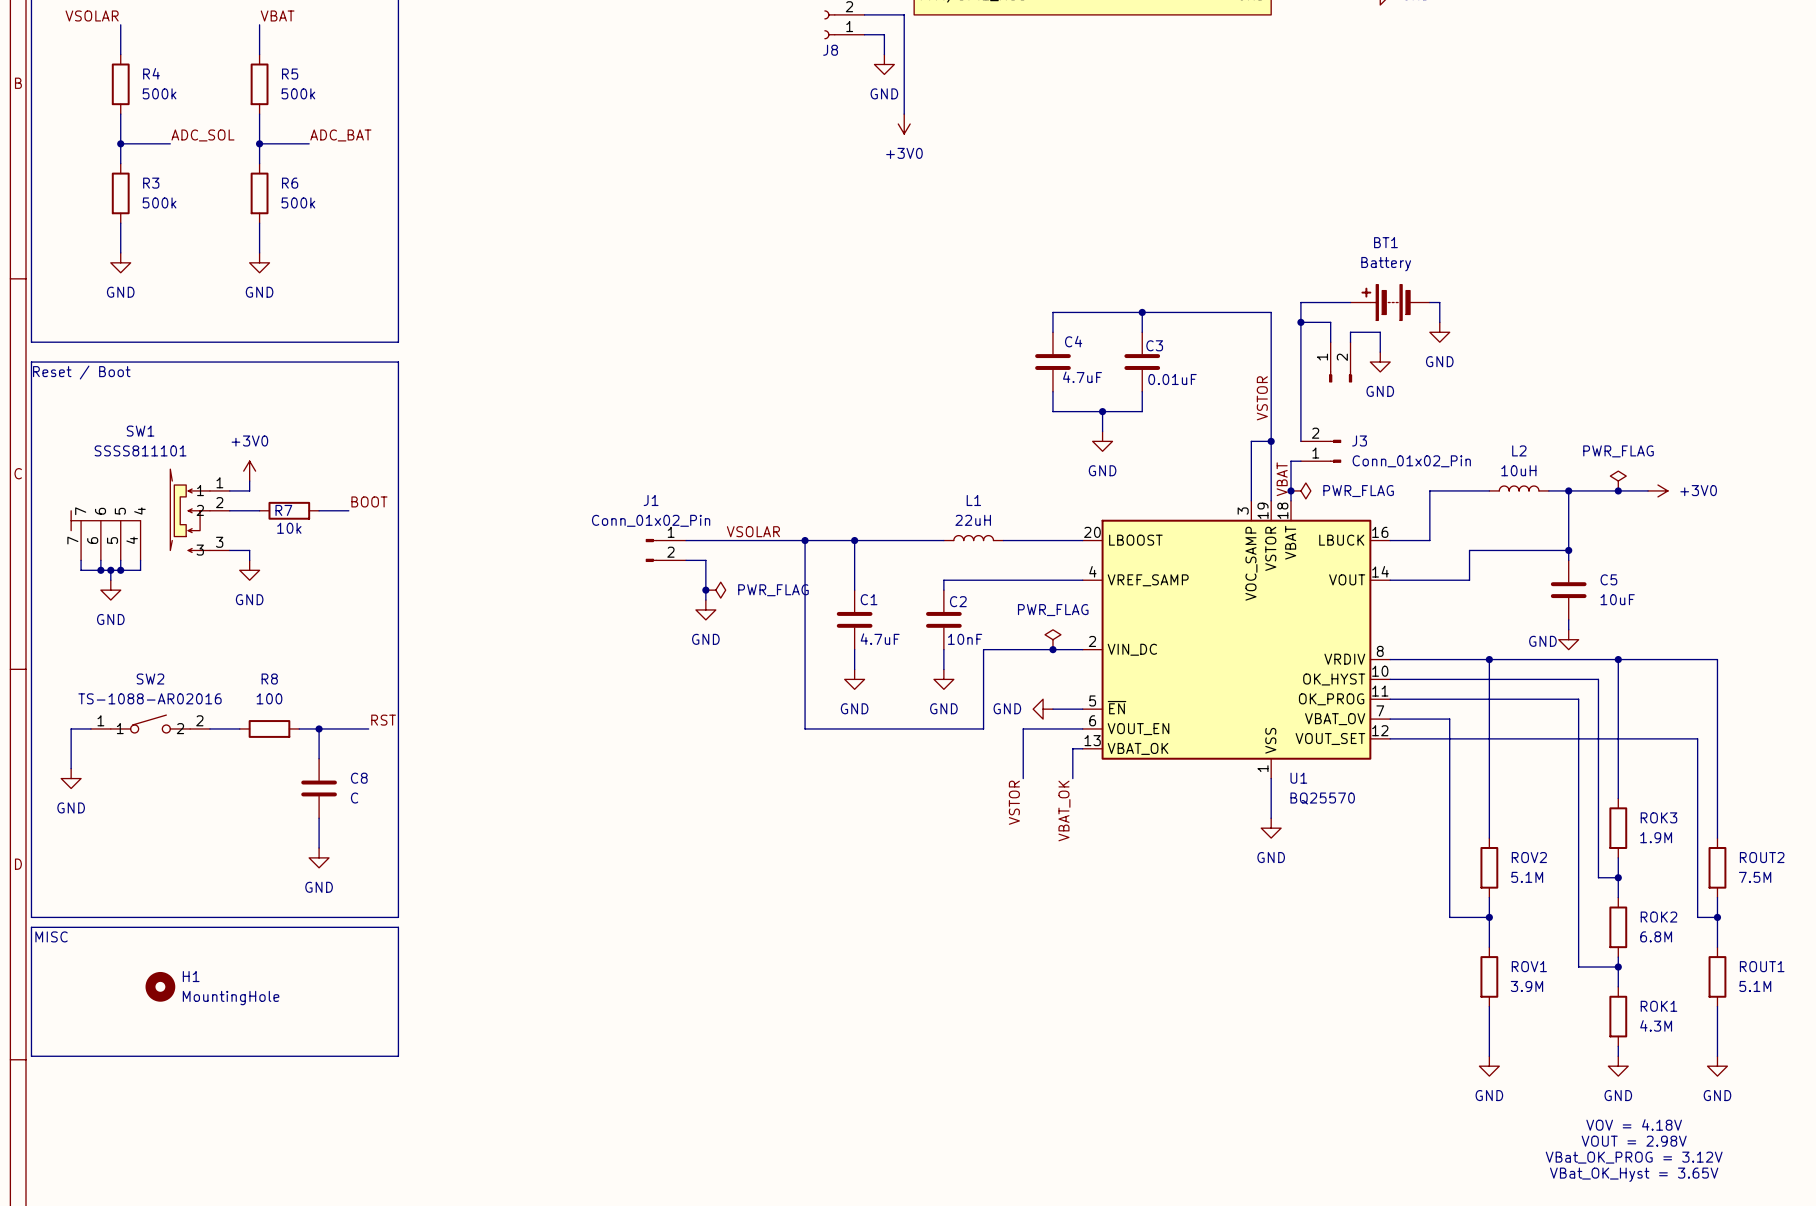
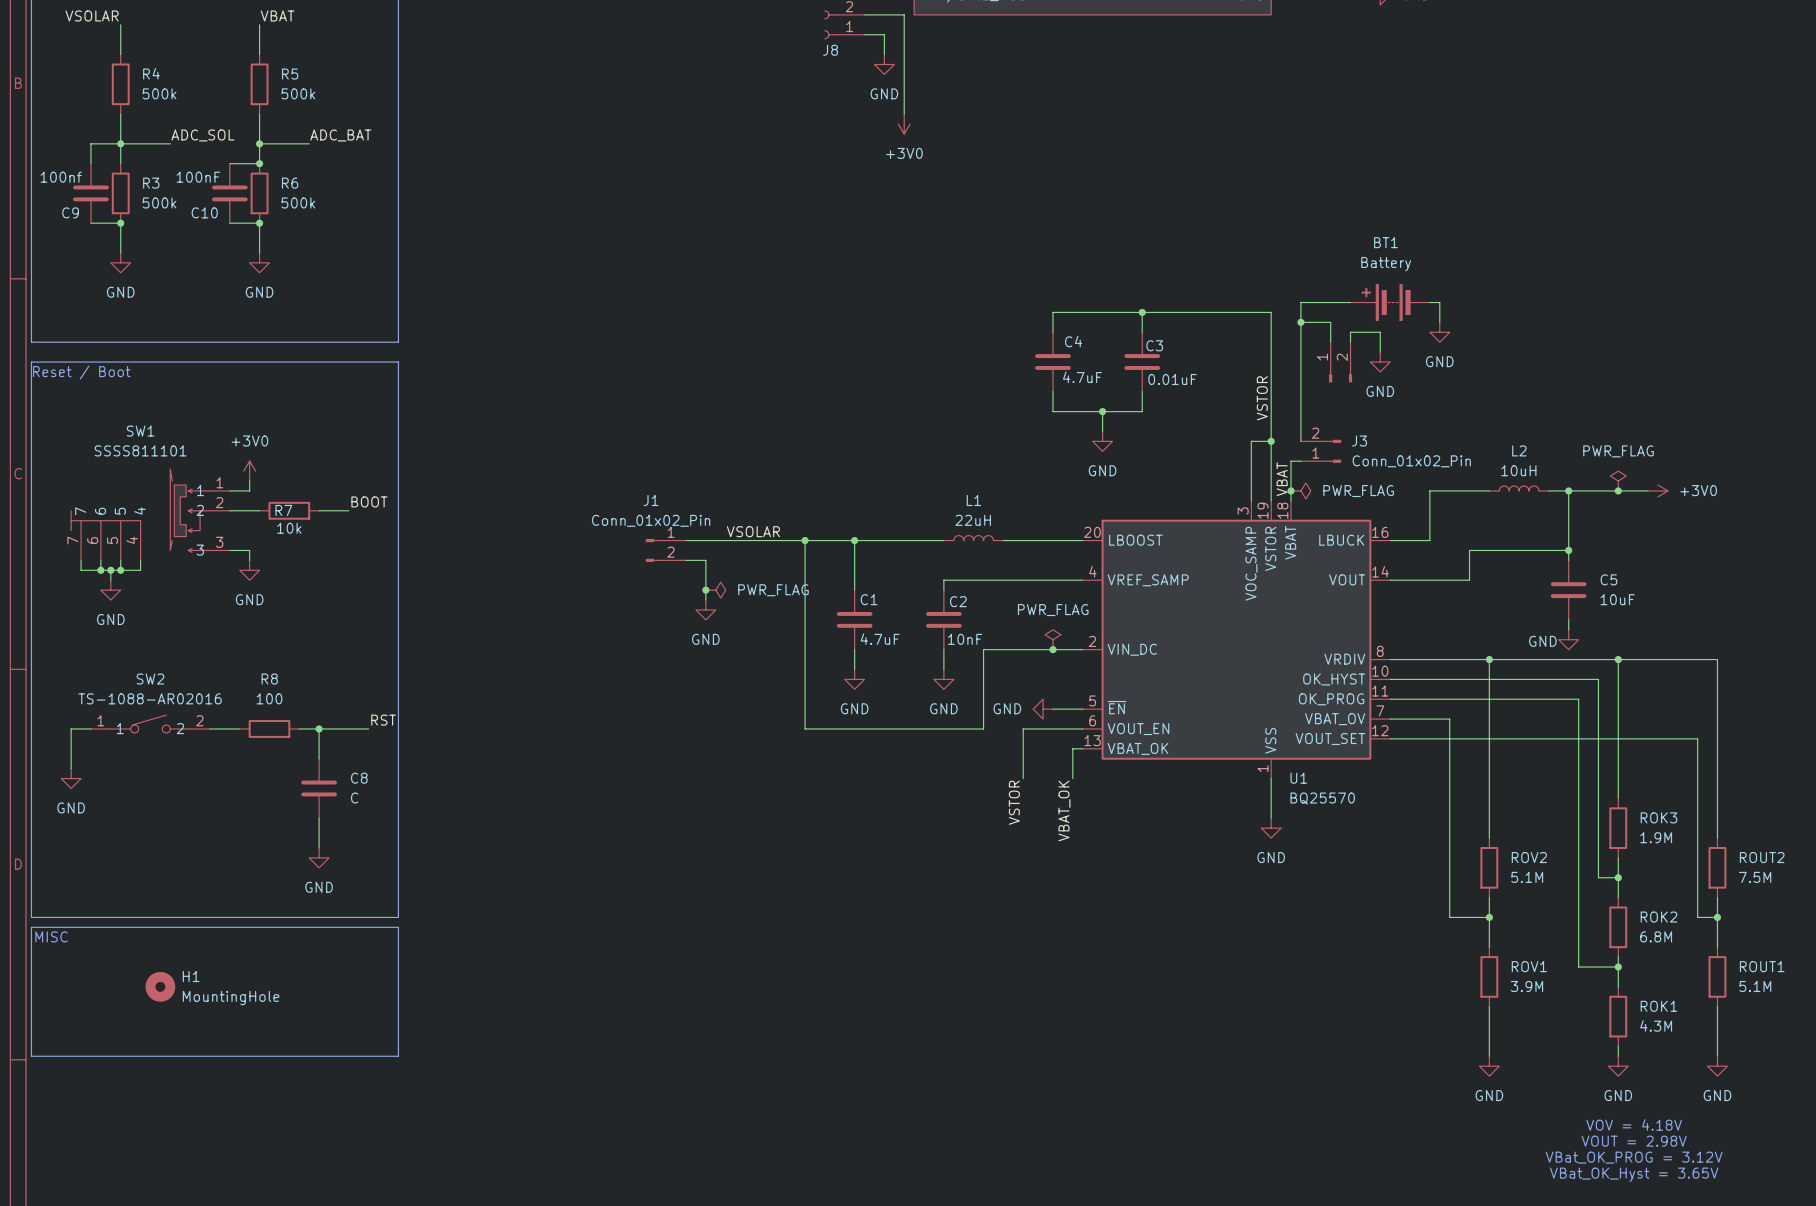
wire: none -> (120, 143) (90, 143) (90, 163)
wire: none -> (229, 163) (259, 163)
junction: none -> (259, 163)
C9: none -> 100nf (90, 193)
C10: none -> 100nF (229, 193)
wire: none -> (90, 223) (120, 223)
junction: none -> (120, 223)
wire: none -> (229, 223) (259, 223)
junction: none -> (259, 223)

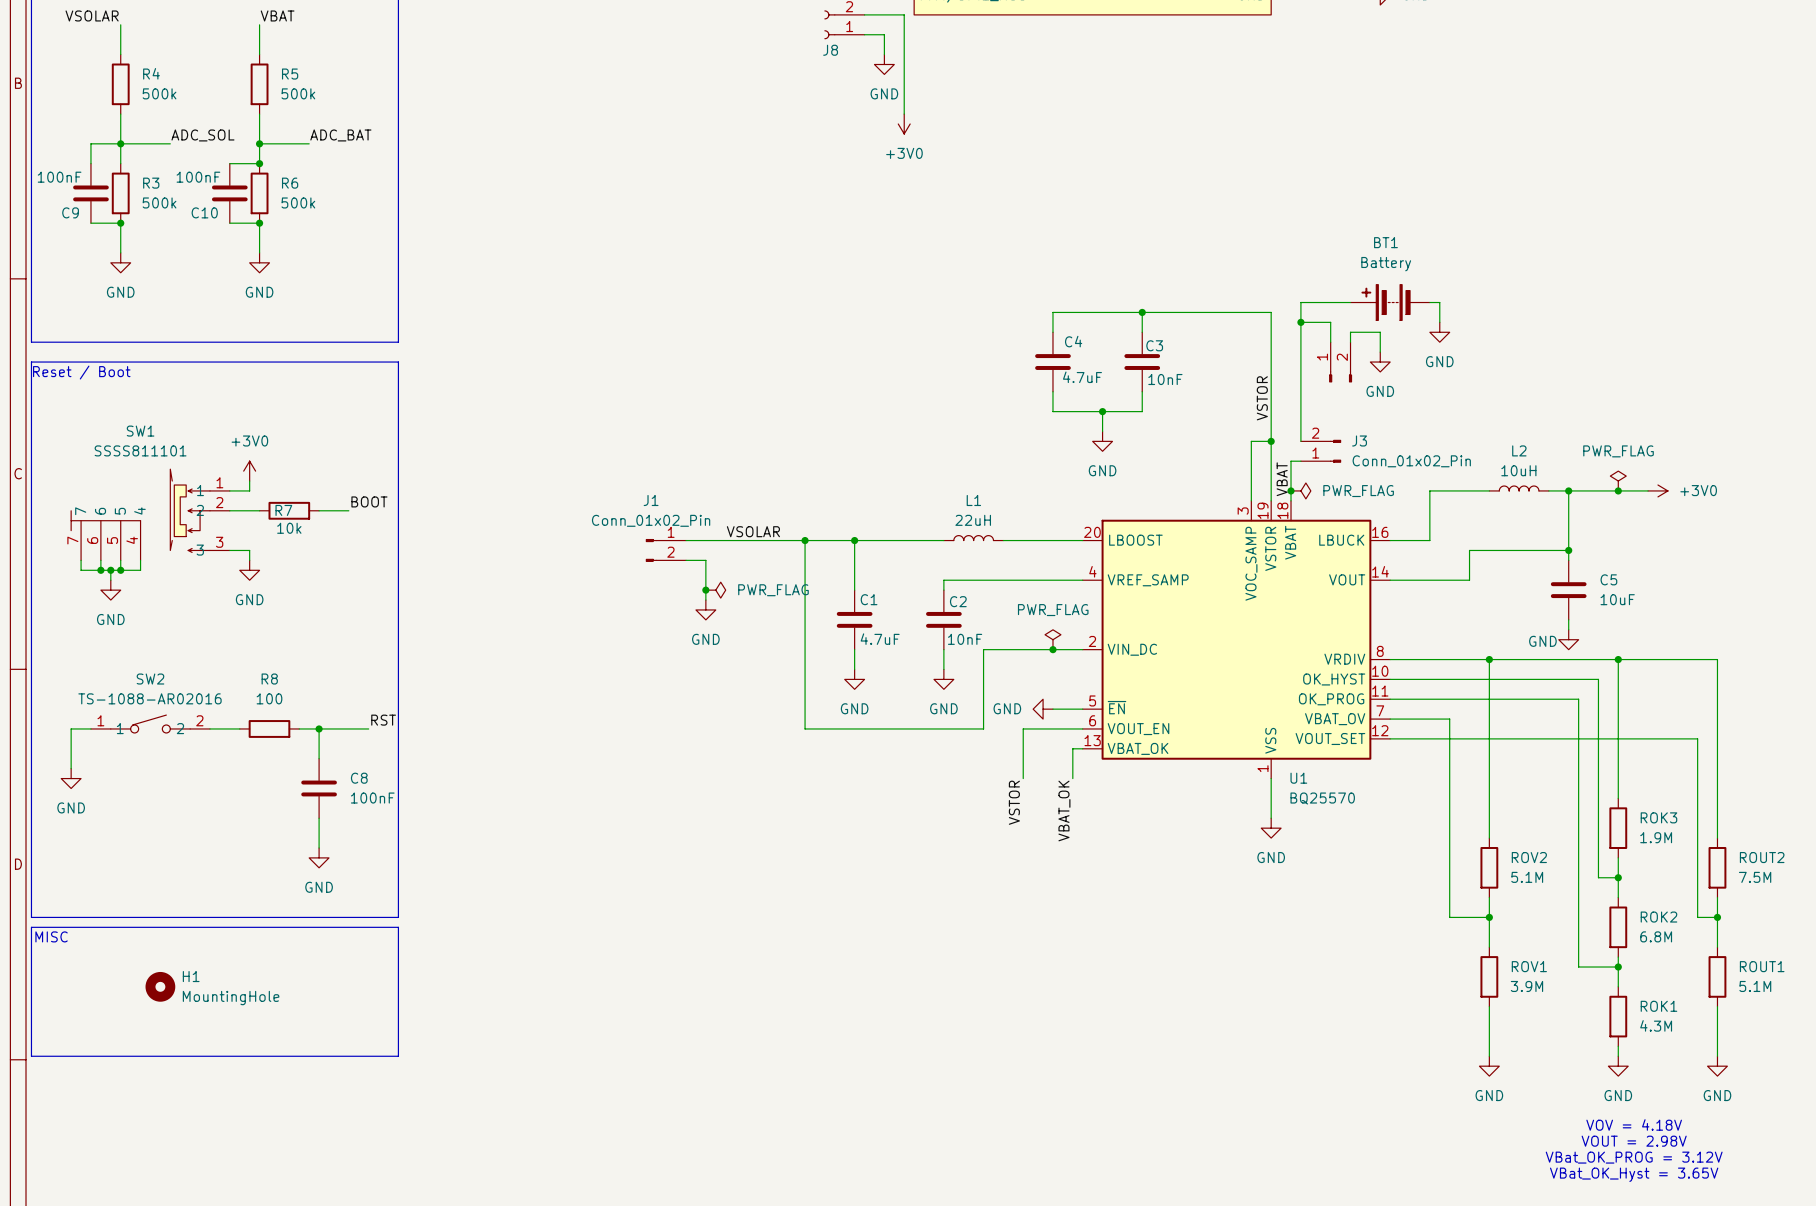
C9 value: 100nf (61, 177) -> 100nF (59, 177)
C3 value: 0.01uF (1172, 379) -> 10nF (1165, 379)
C8 value: C (354, 798) -> 100nF (372, 798)

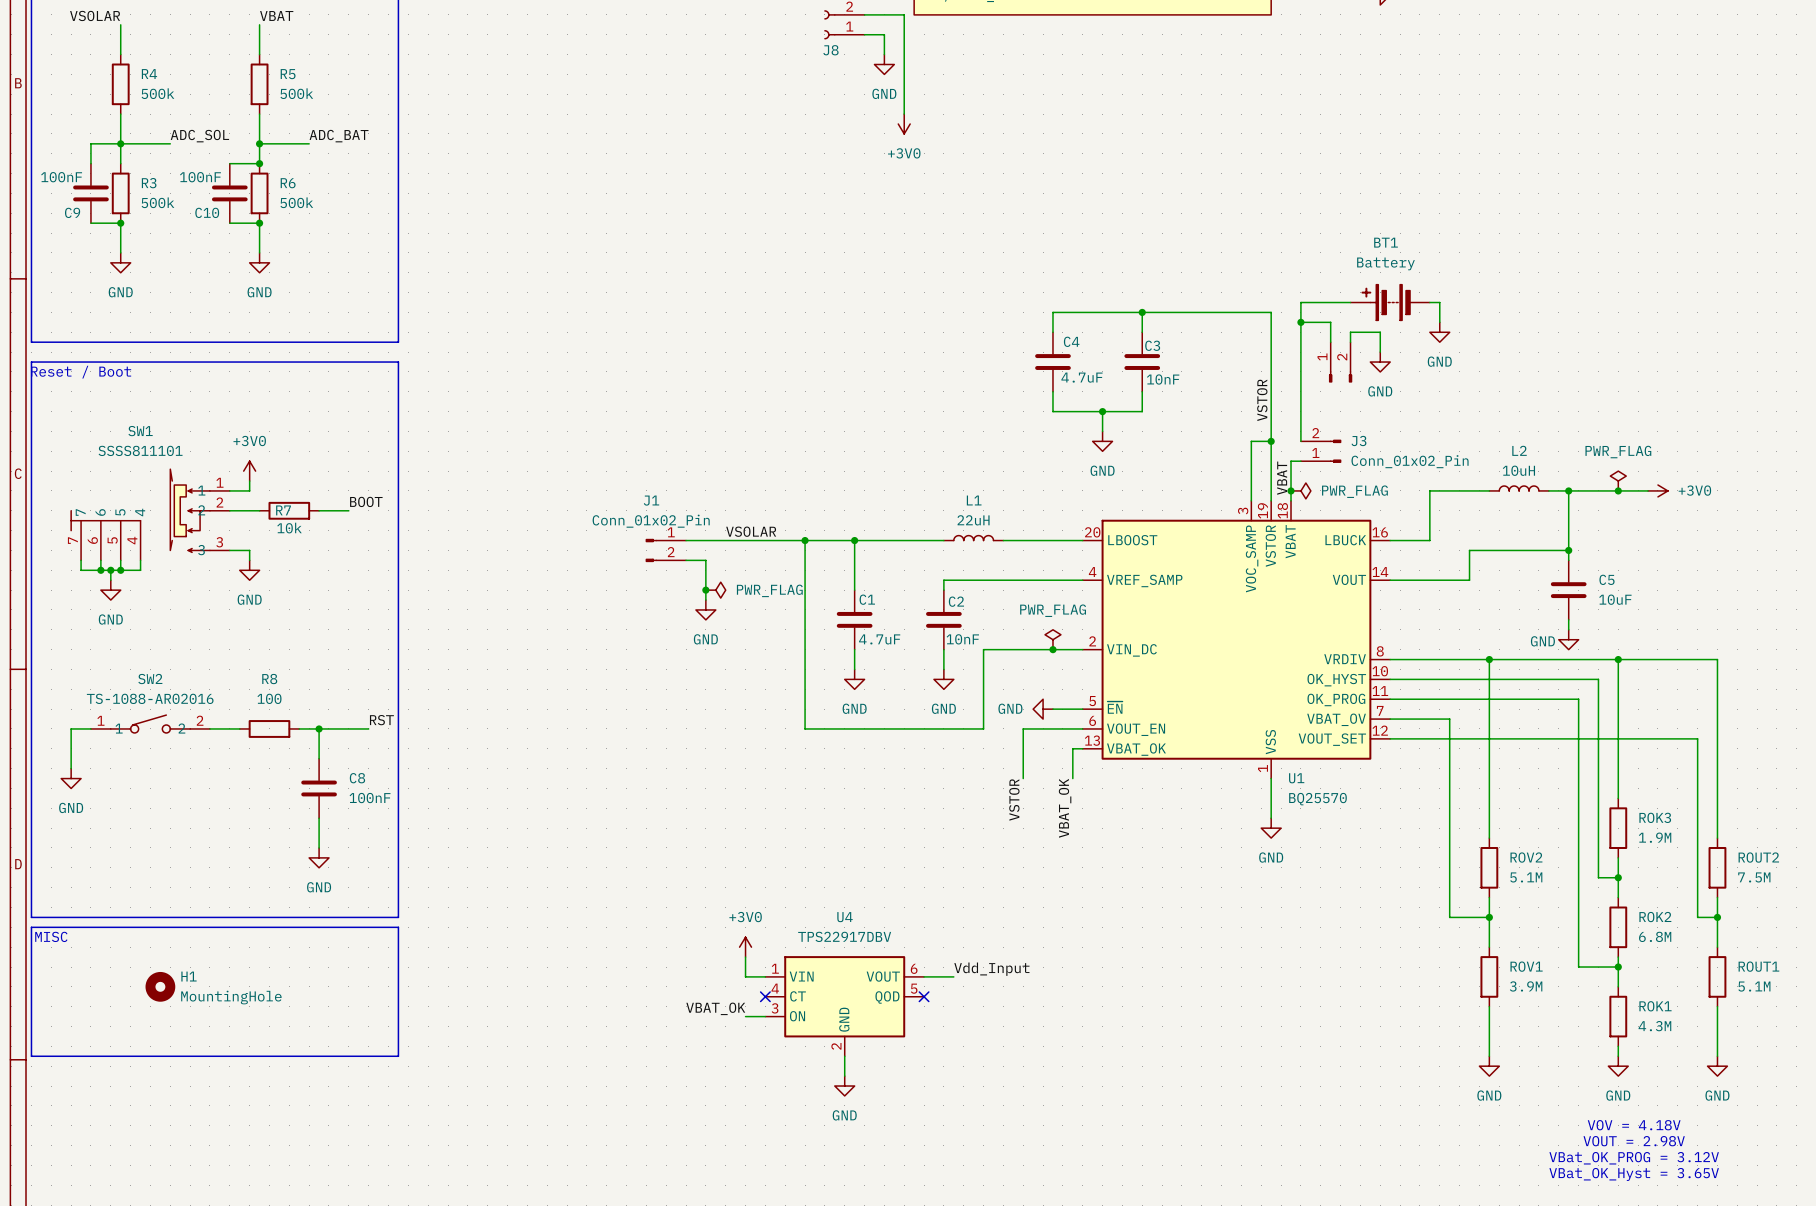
power symbol: none -> +3V0 (745, 947)
wire: none -> (745, 957) (745, 976) (765, 976)
label: none -> Vdd_Input (991, 969)
wire: none -> (924, 976) (953, 976)
no-connect mark: none -> (765, 996)
no-connect mark: none -> (924, 996)
U4: none -> TPS22917DBV (844, 1006)
label: none -> VBAT_OK (715, 1008)
wire: none -> (745, 1016) (765, 1016)
wire: none -> (844, 1056) (844, 1076)
power symbol: none -> GND (844, 1086)

